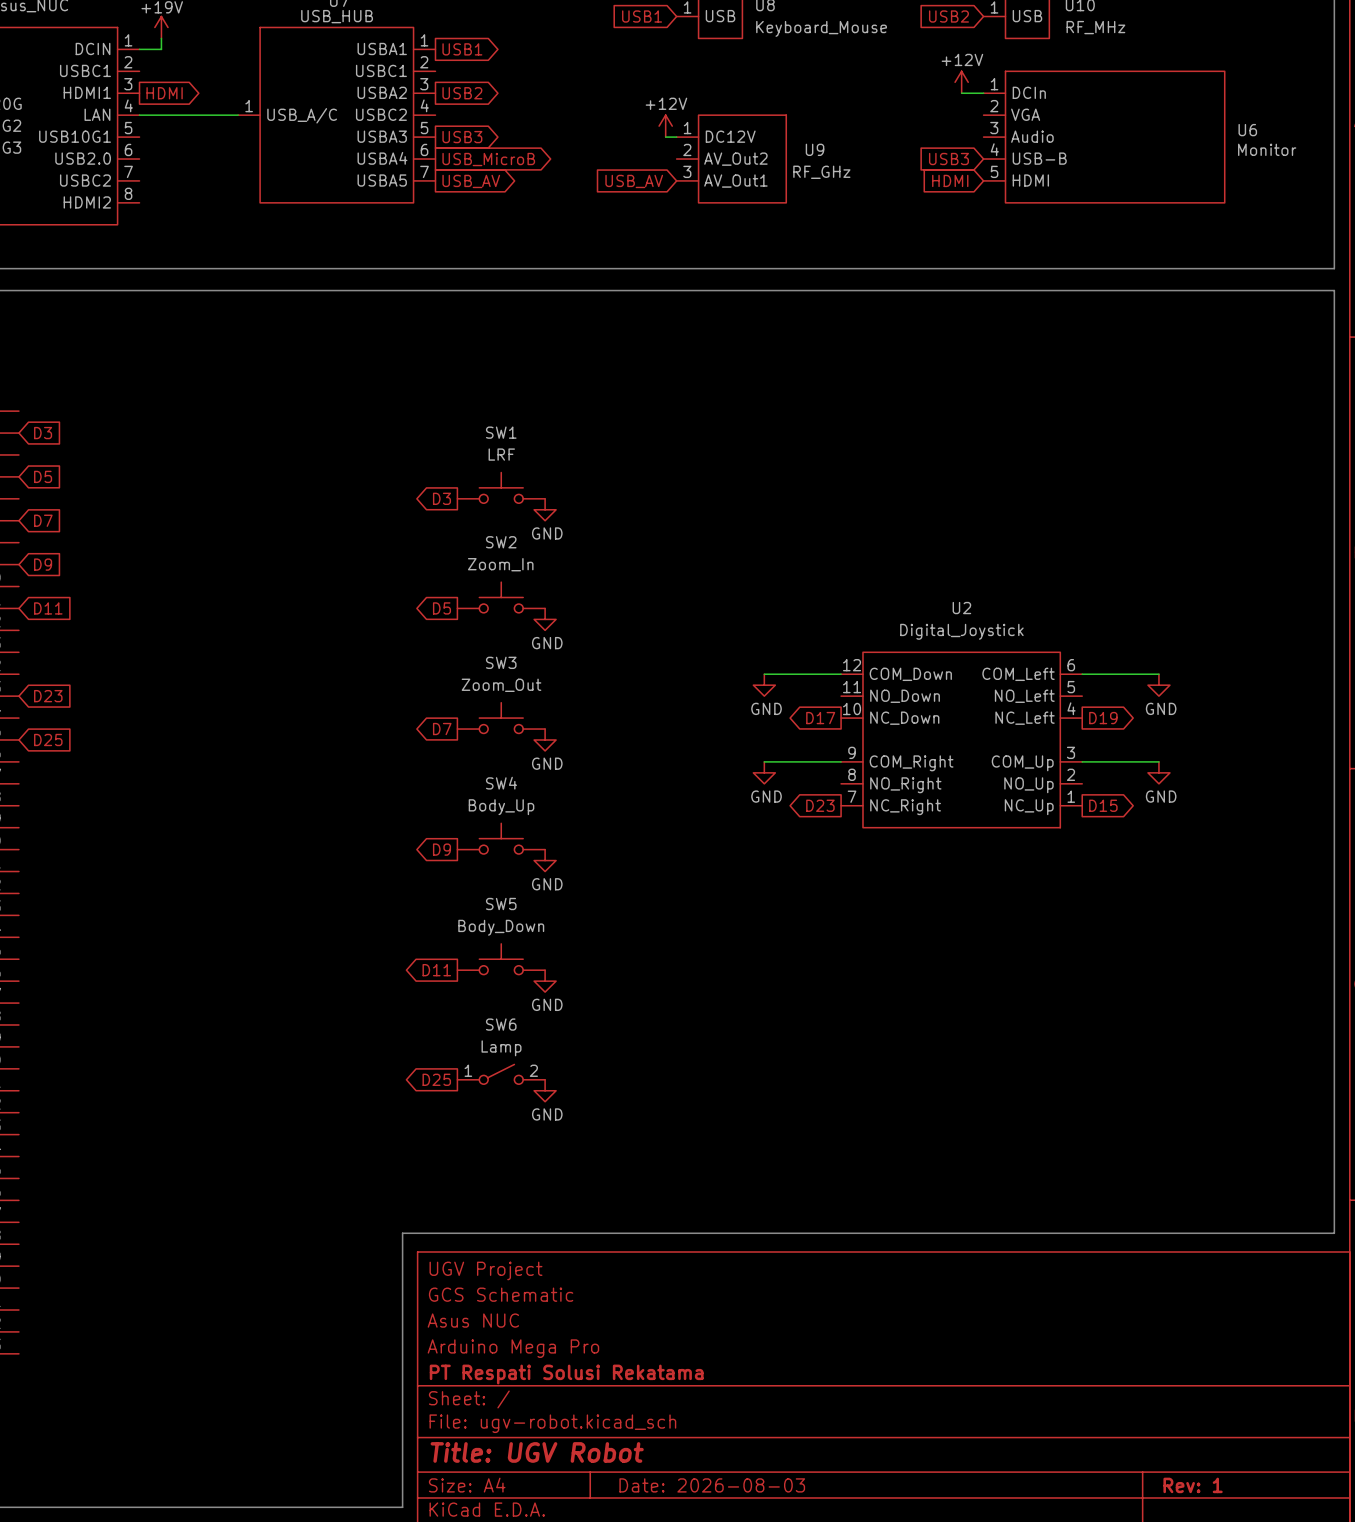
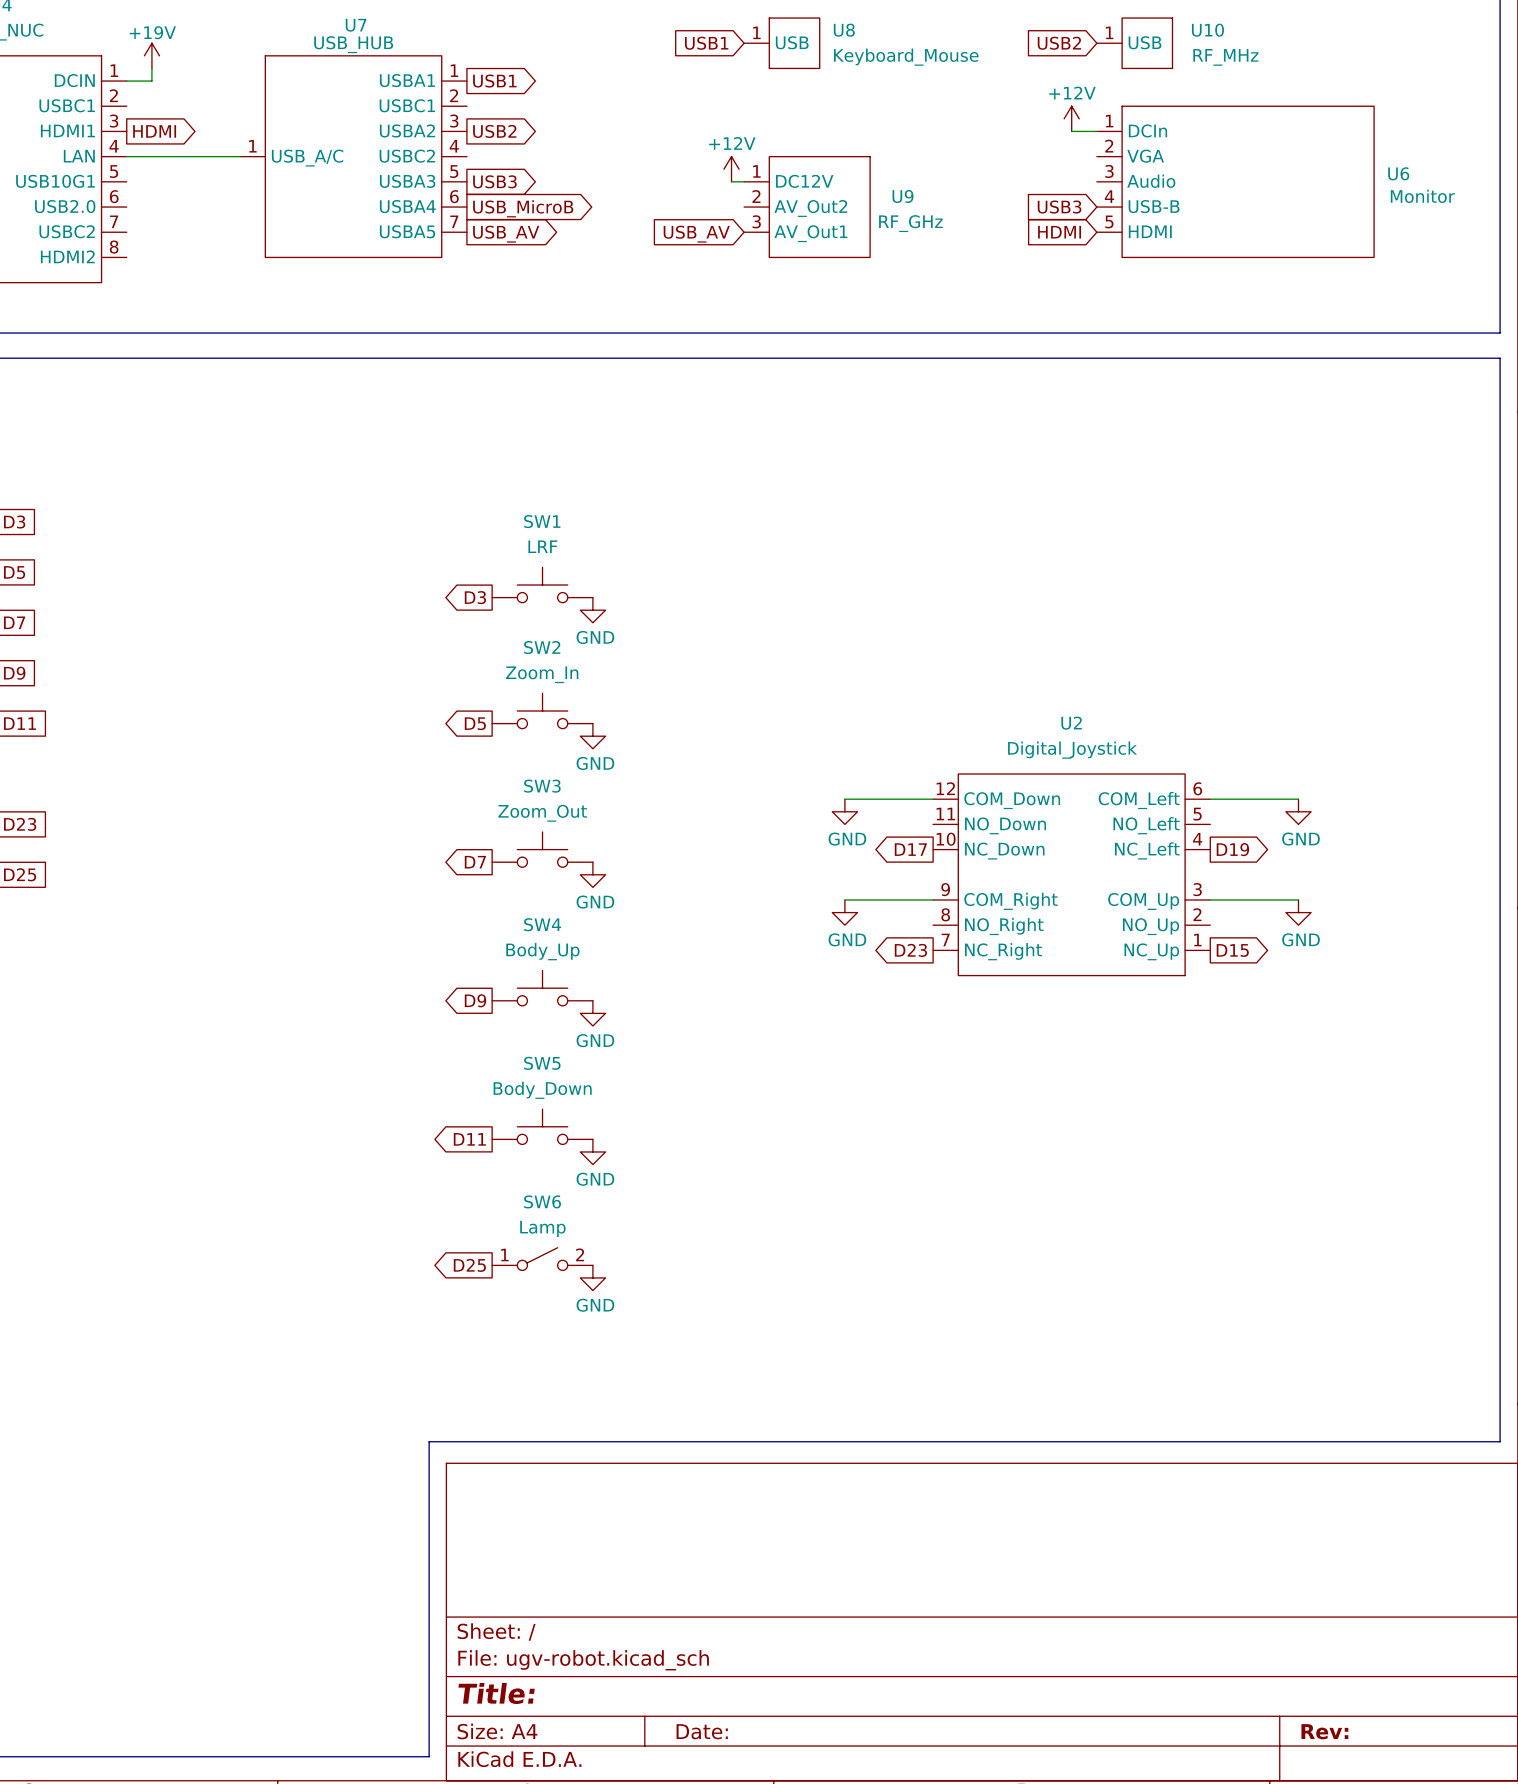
title block: UGV Project (485, 1270) -> none
title block: GCS Schematic (501, 1294) -> none
title block: Asus NUC (473, 1320) -> none
title block: Arduino Mega Pro (513, 1348) -> none
title block: PT Respati Solusi Rekatama (566, 1374) -> none
title block: Title: UGV Robot (537, 1452) -> Title: (496, 1693)
title block: Date: 2026-08-03 (712, 1485) -> Date: (702, 1731)
title block: Rev: 1 (1193, 1485) -> Rev: (1324, 1731)

